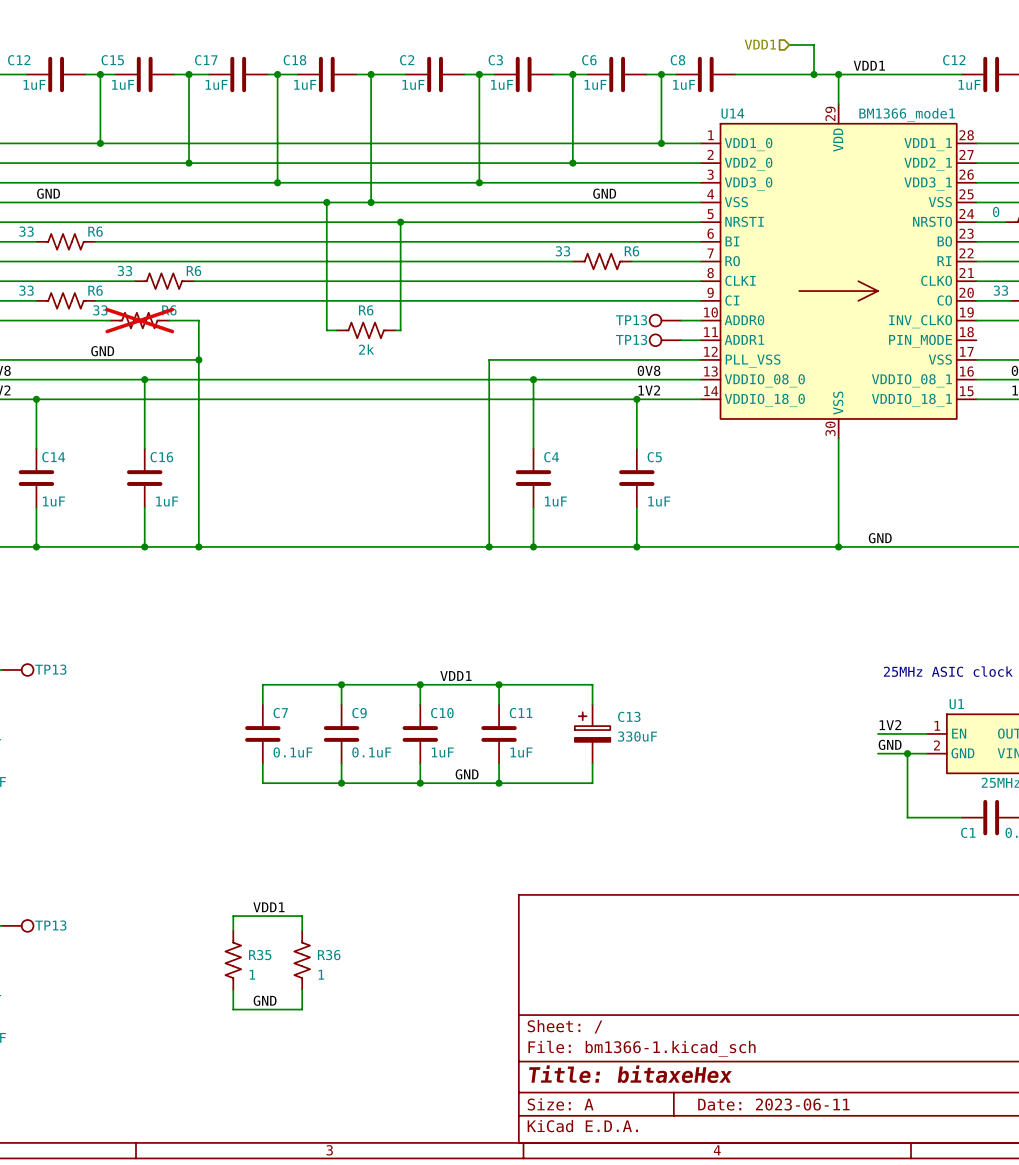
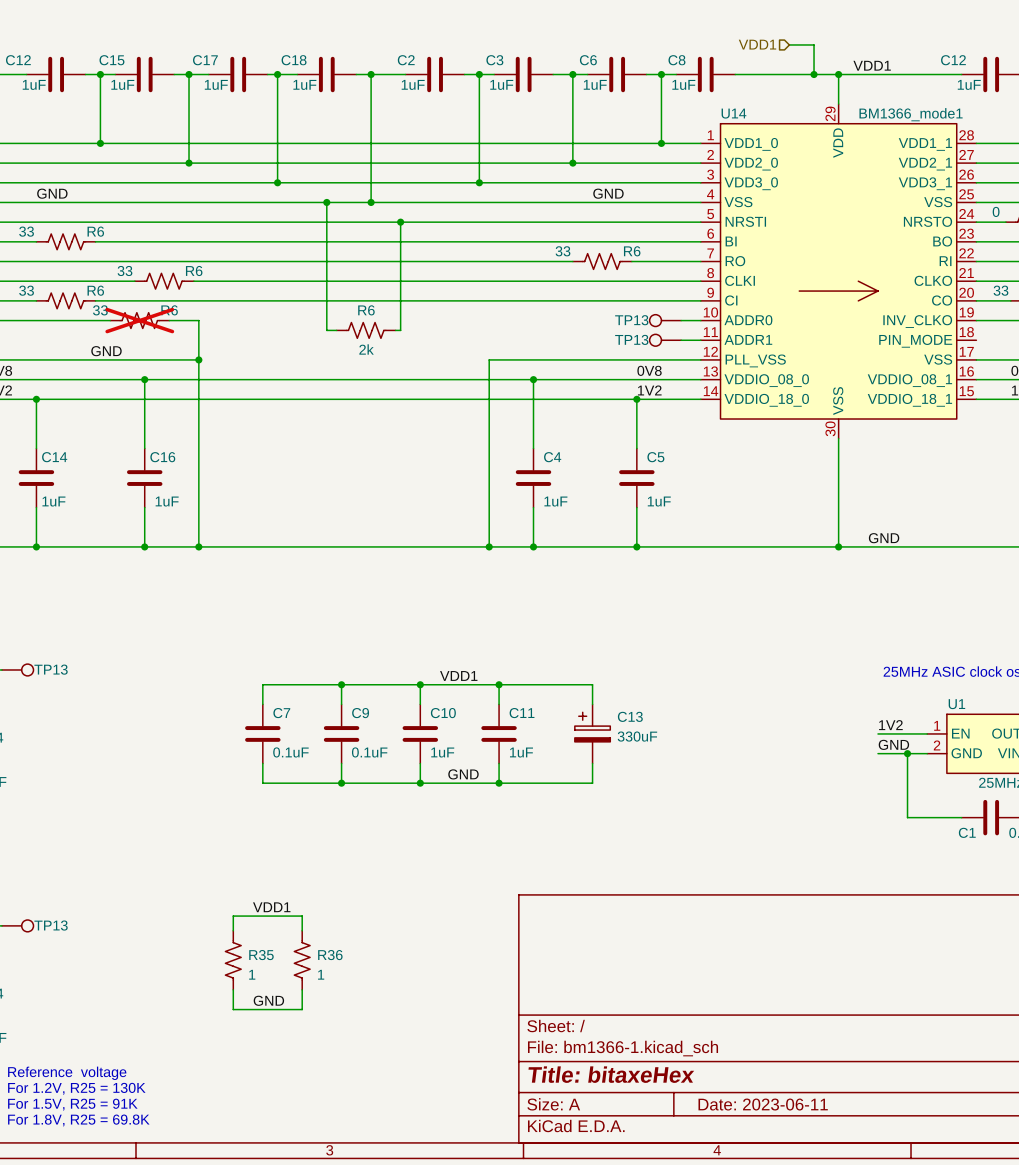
text: none -> Reference voltage (67, 1073)
text: none -> For 1.2V, R25 = 130K (76, 1088)
text: none -> For 1.5V, R25 = 91K (72, 1104)
text: none -> For 1.8V, R25 = 69.8K (78, 1120)

